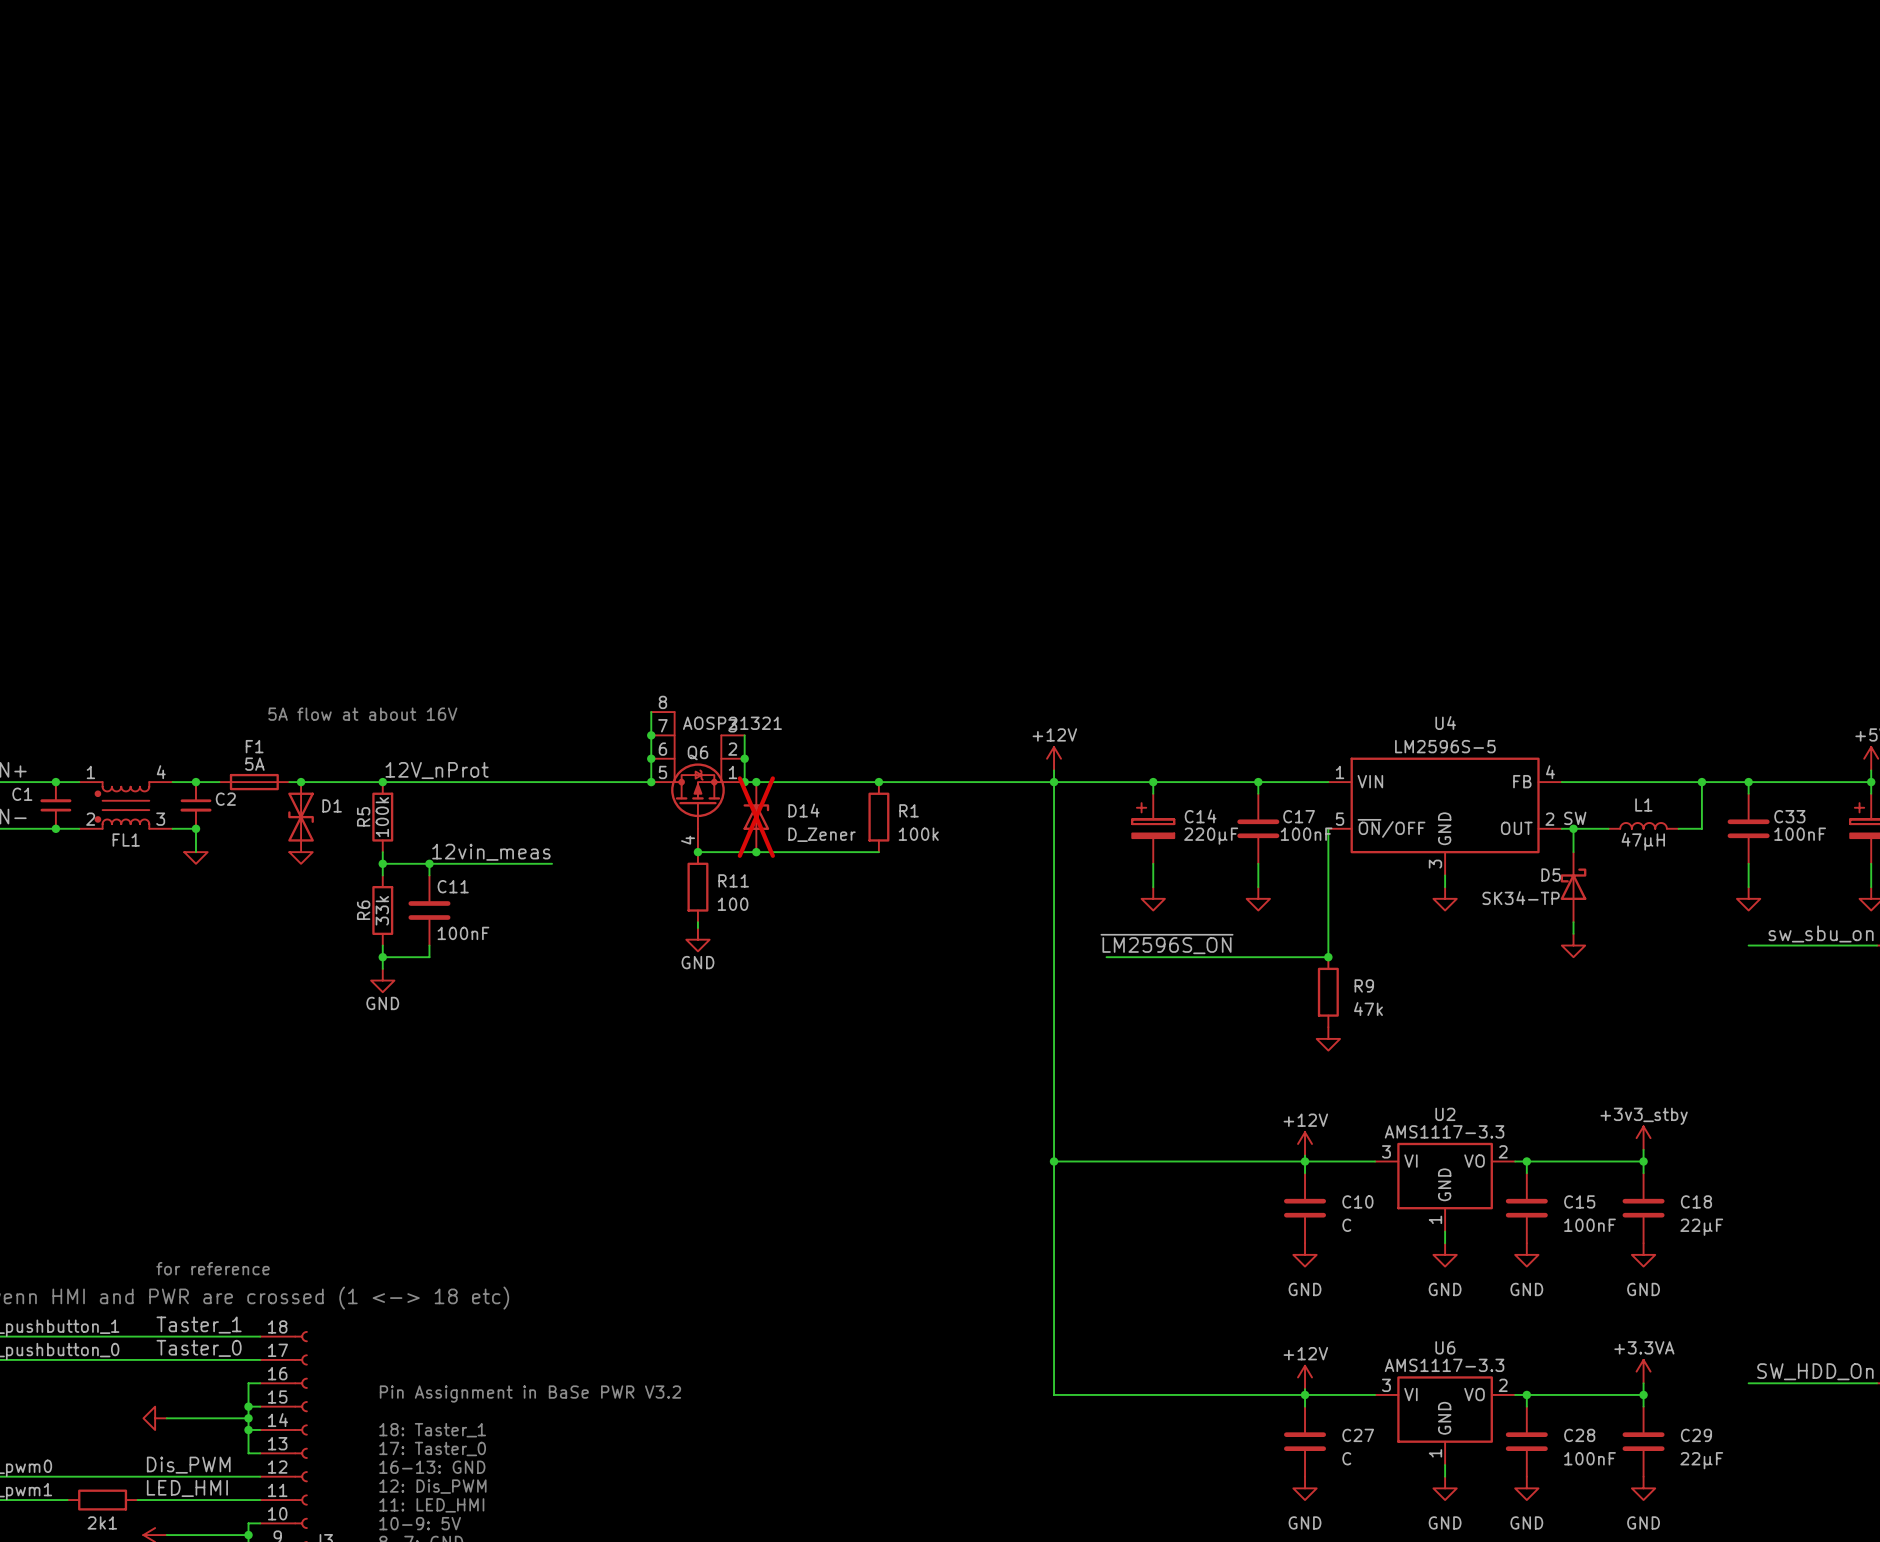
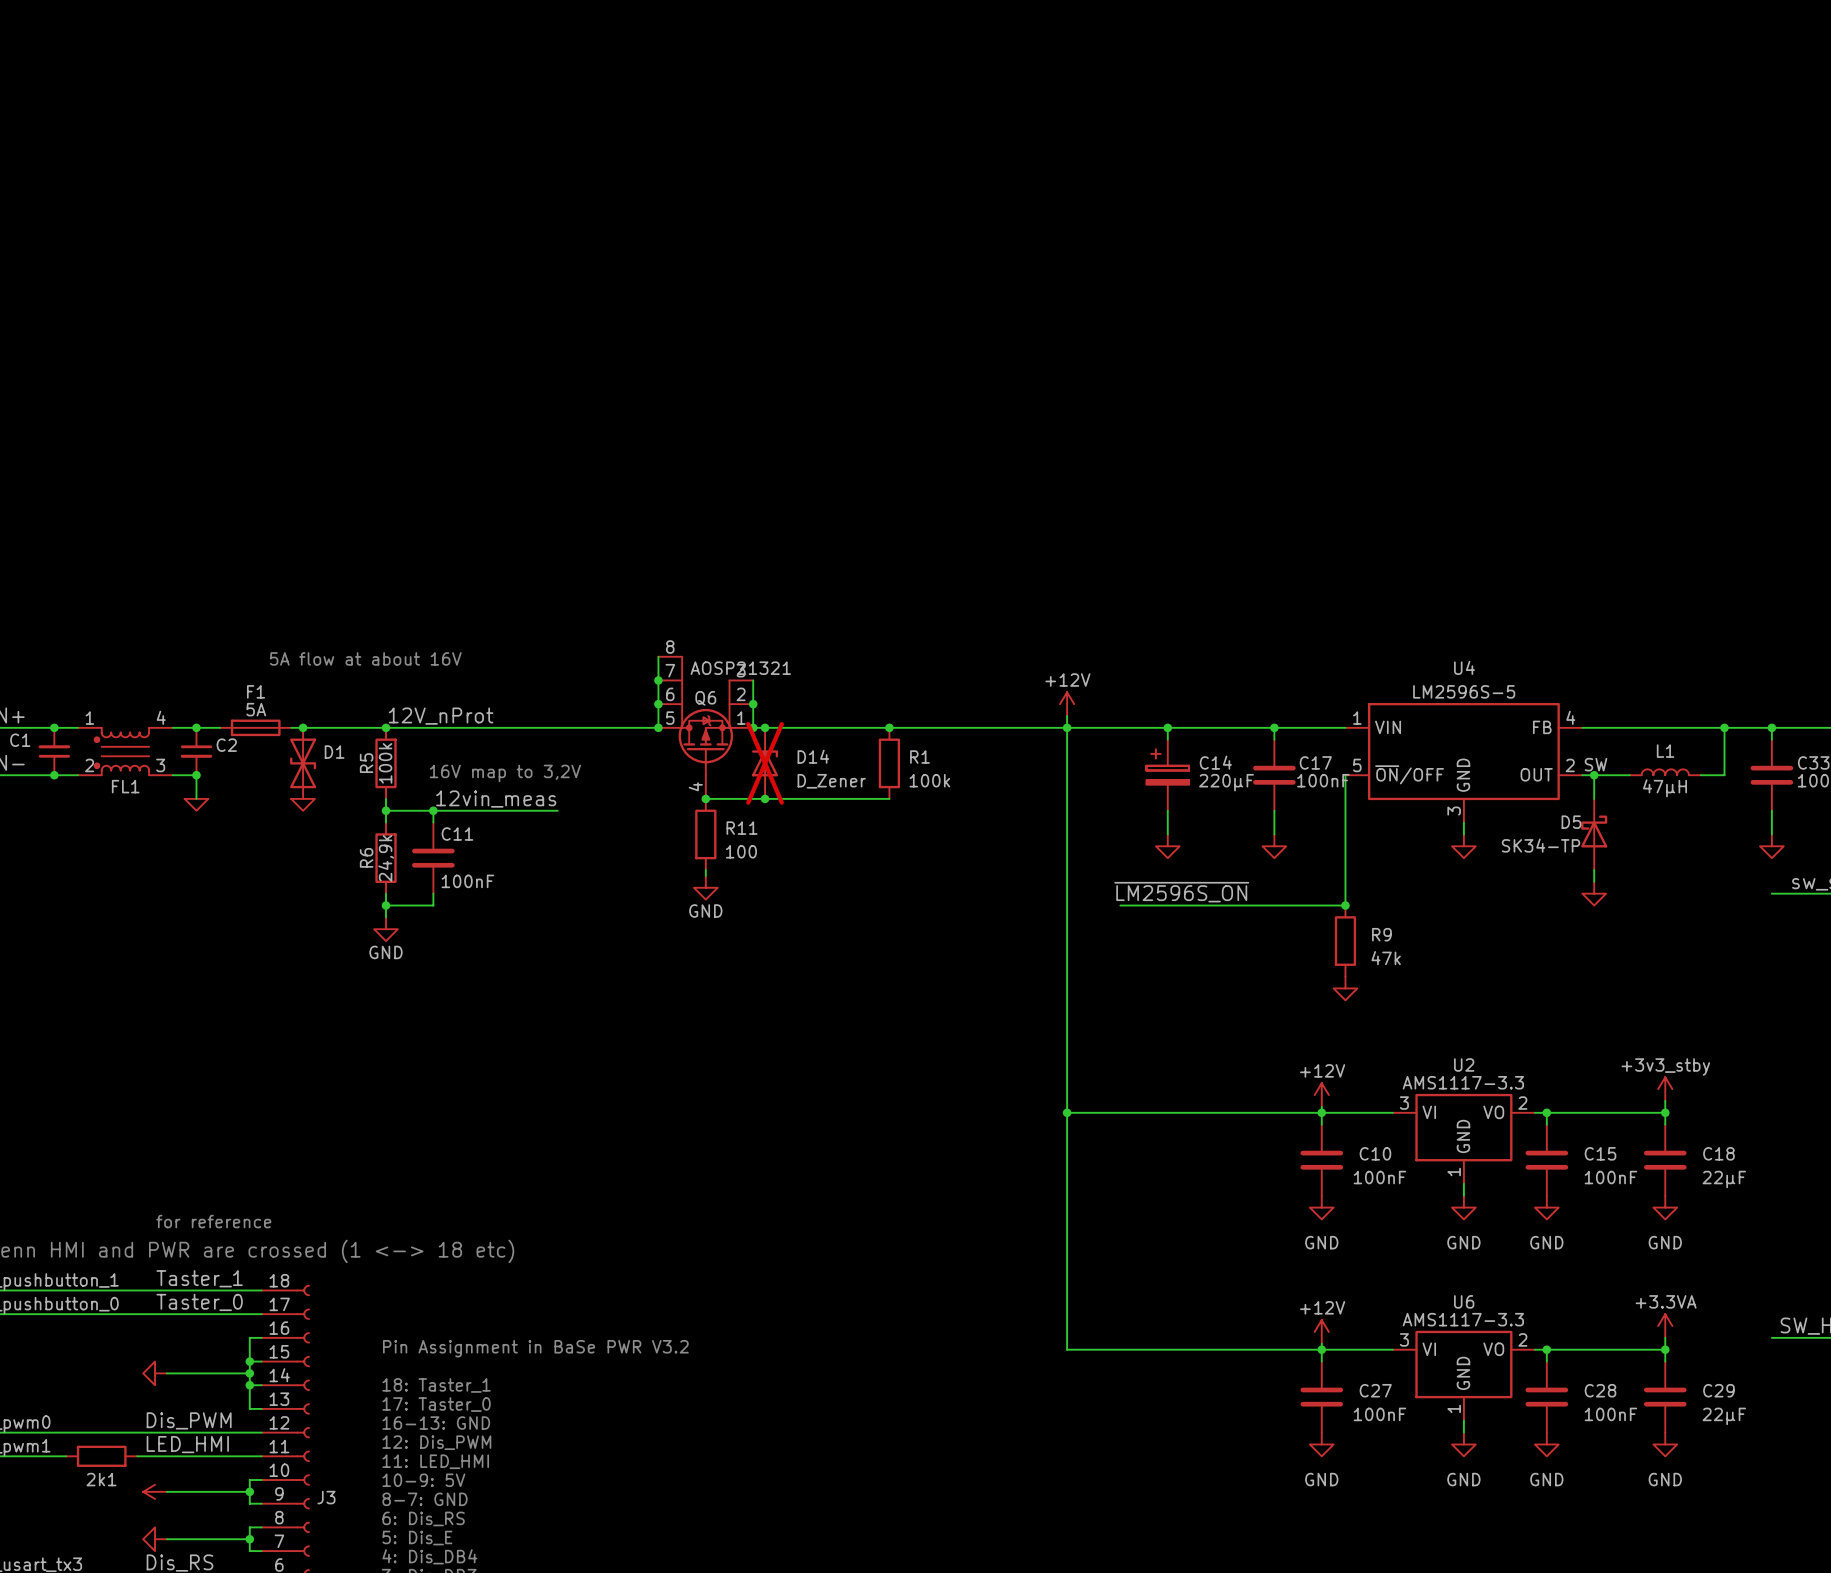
text: none -> 16V map to 3,2V (505, 773)
R6 value: 33k (382, 910) -> 24,9k (386, 858)
C10 value: C (1346, 1225) -> 100nF (1379, 1177)
C27 value: C (1346, 1458) -> 100nF (1379, 1414)

